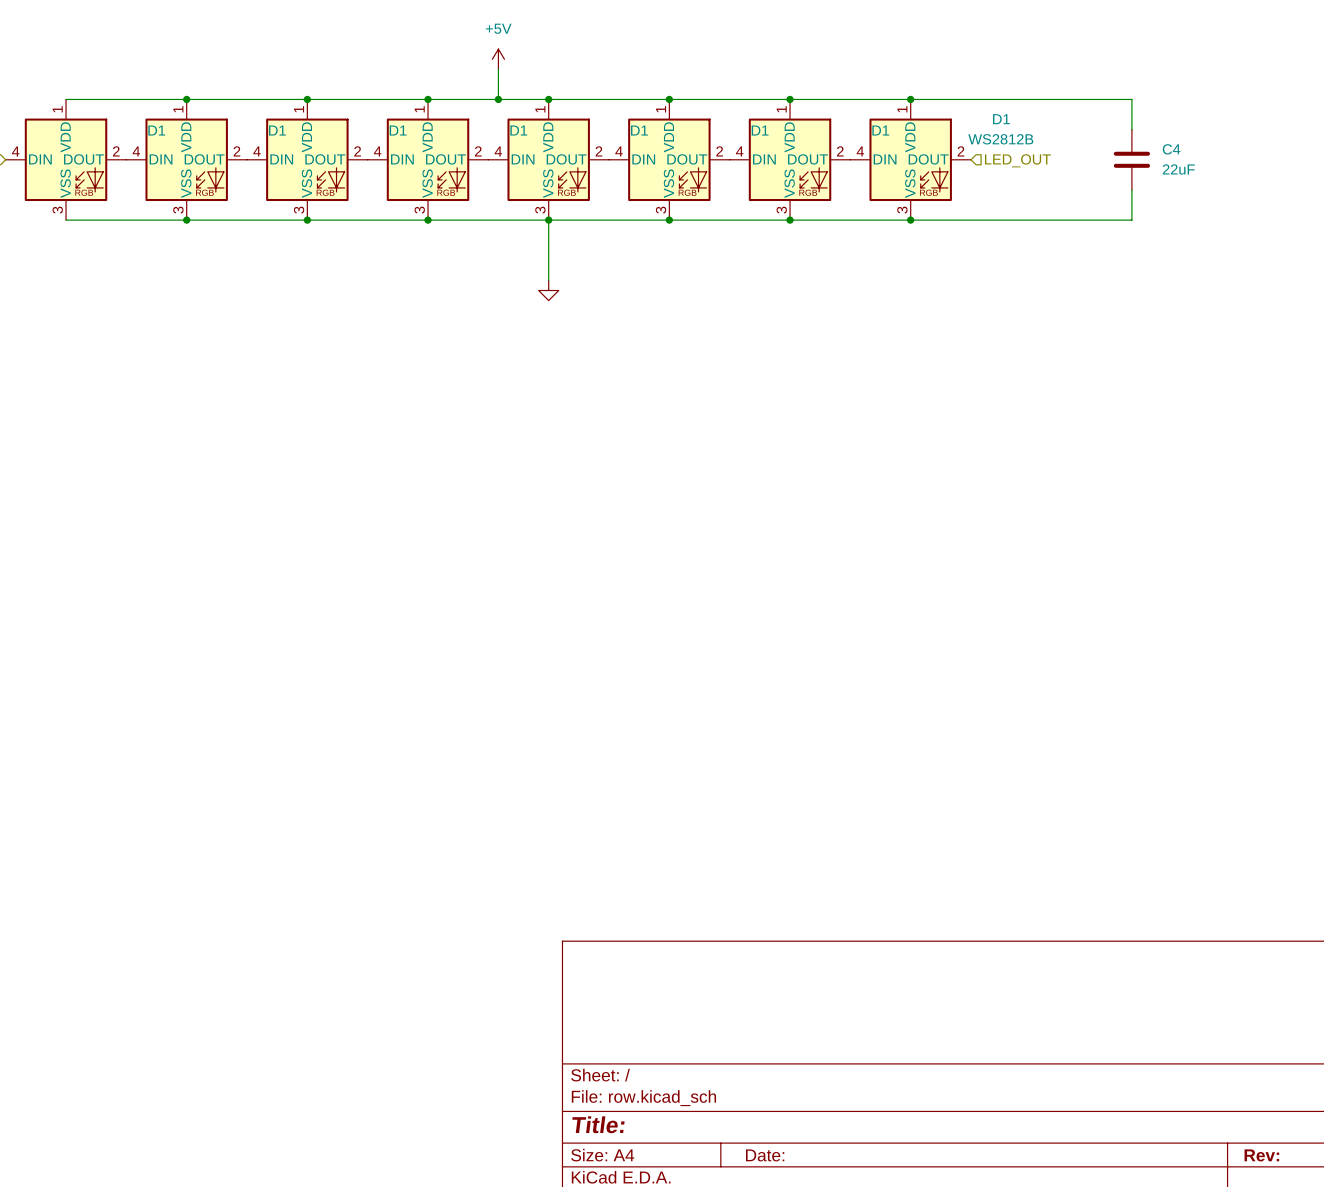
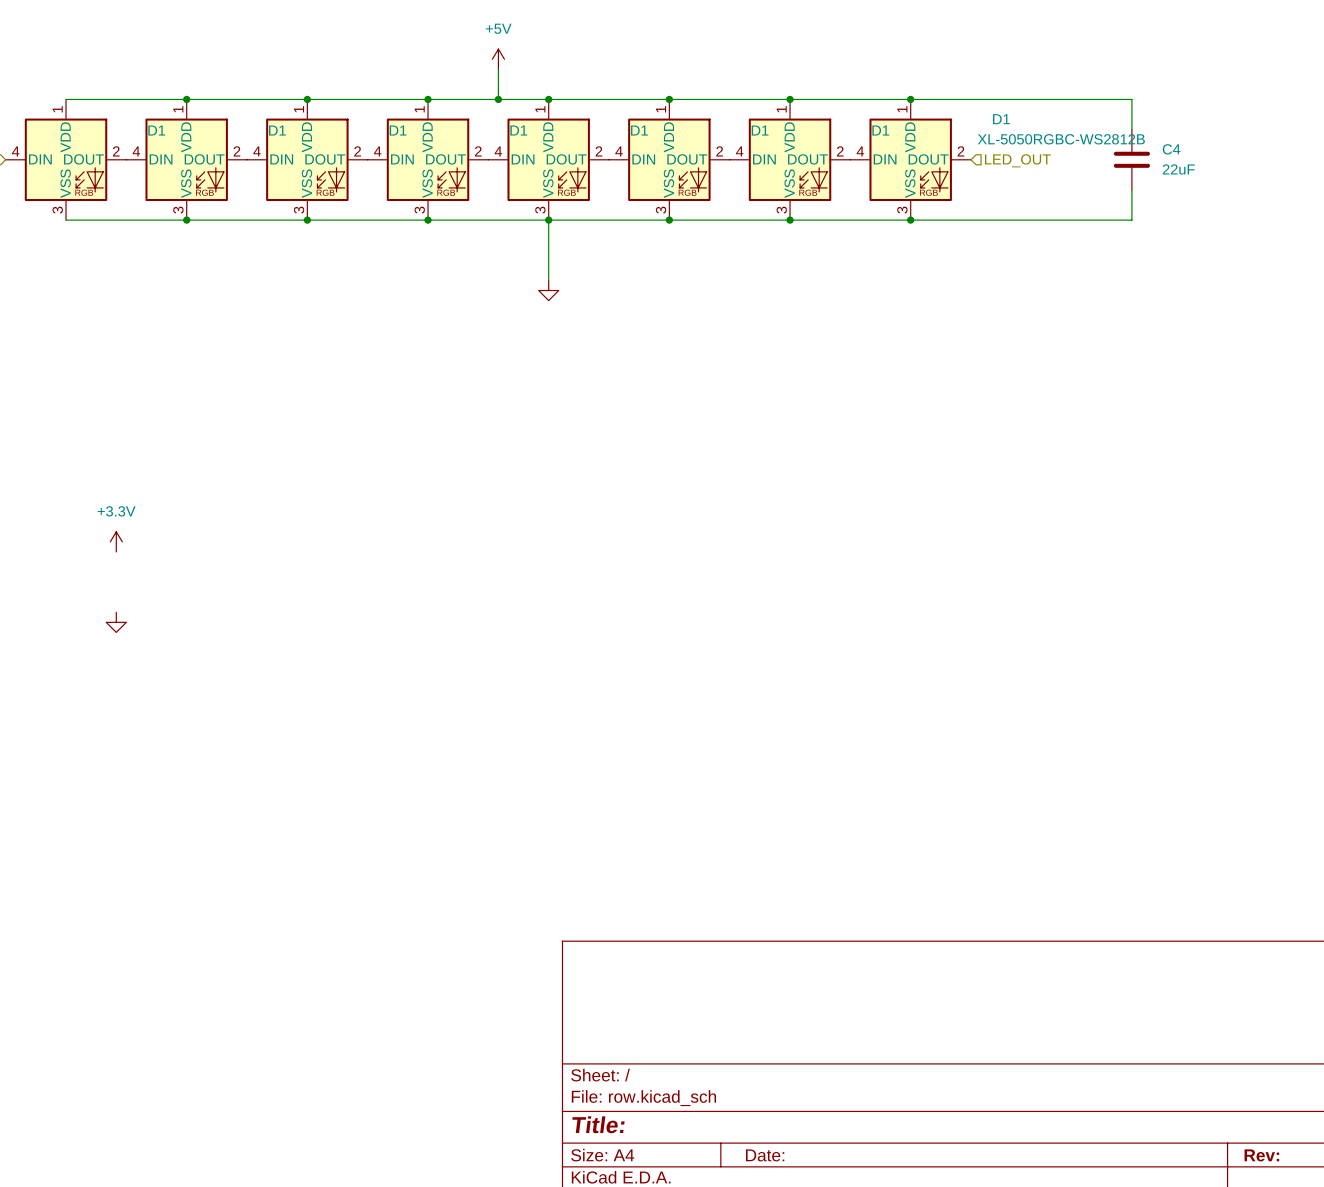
D1 value: WS2812B (1000, 139) -> XL-5050RGBC-WS2812B (1061, 139)
power symbol: none -> +3.3V (116, 541)
power symbol: none -> (116, 622)

